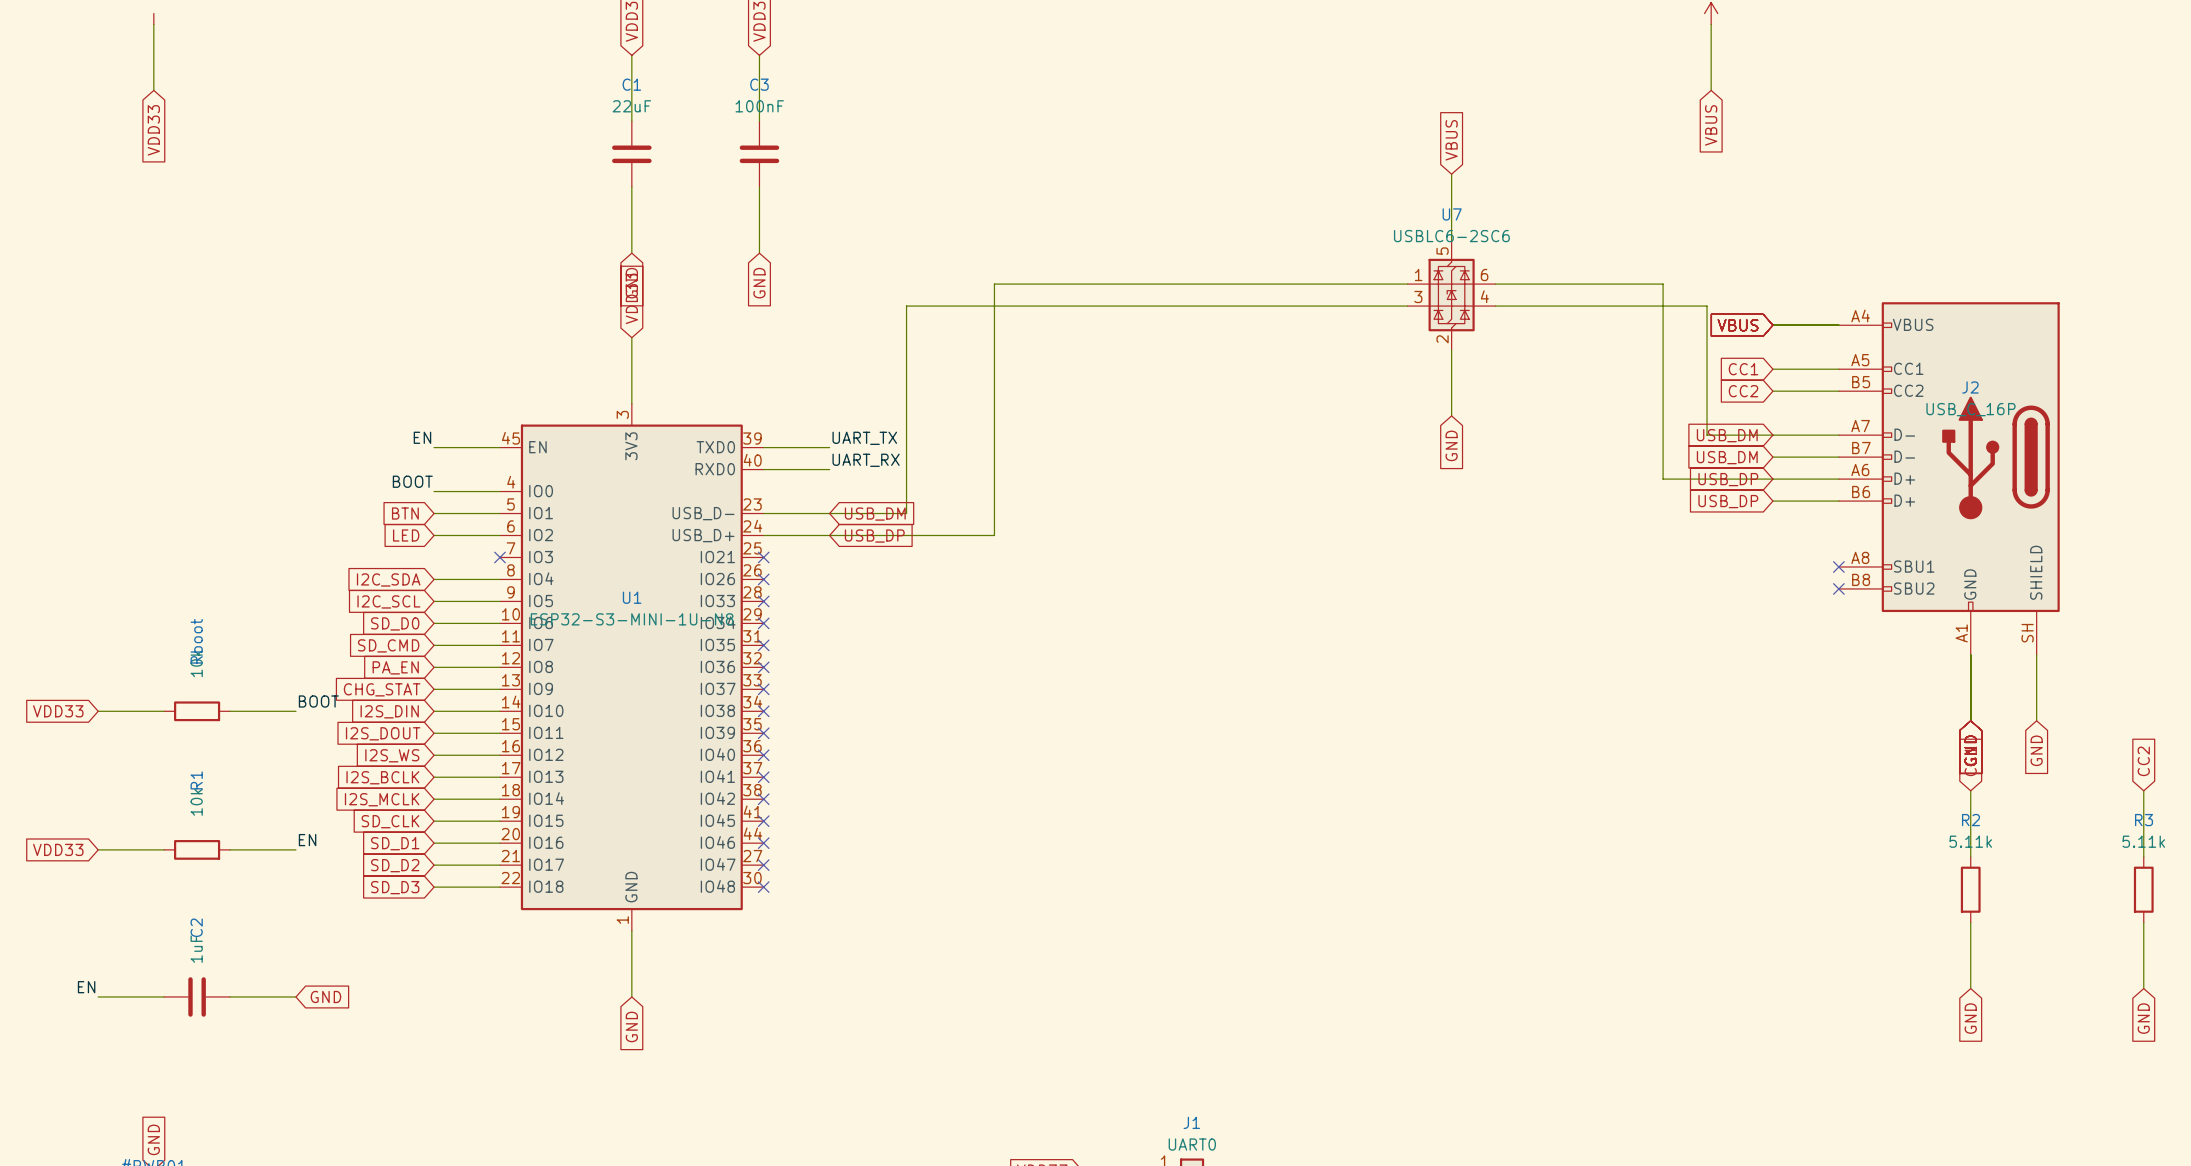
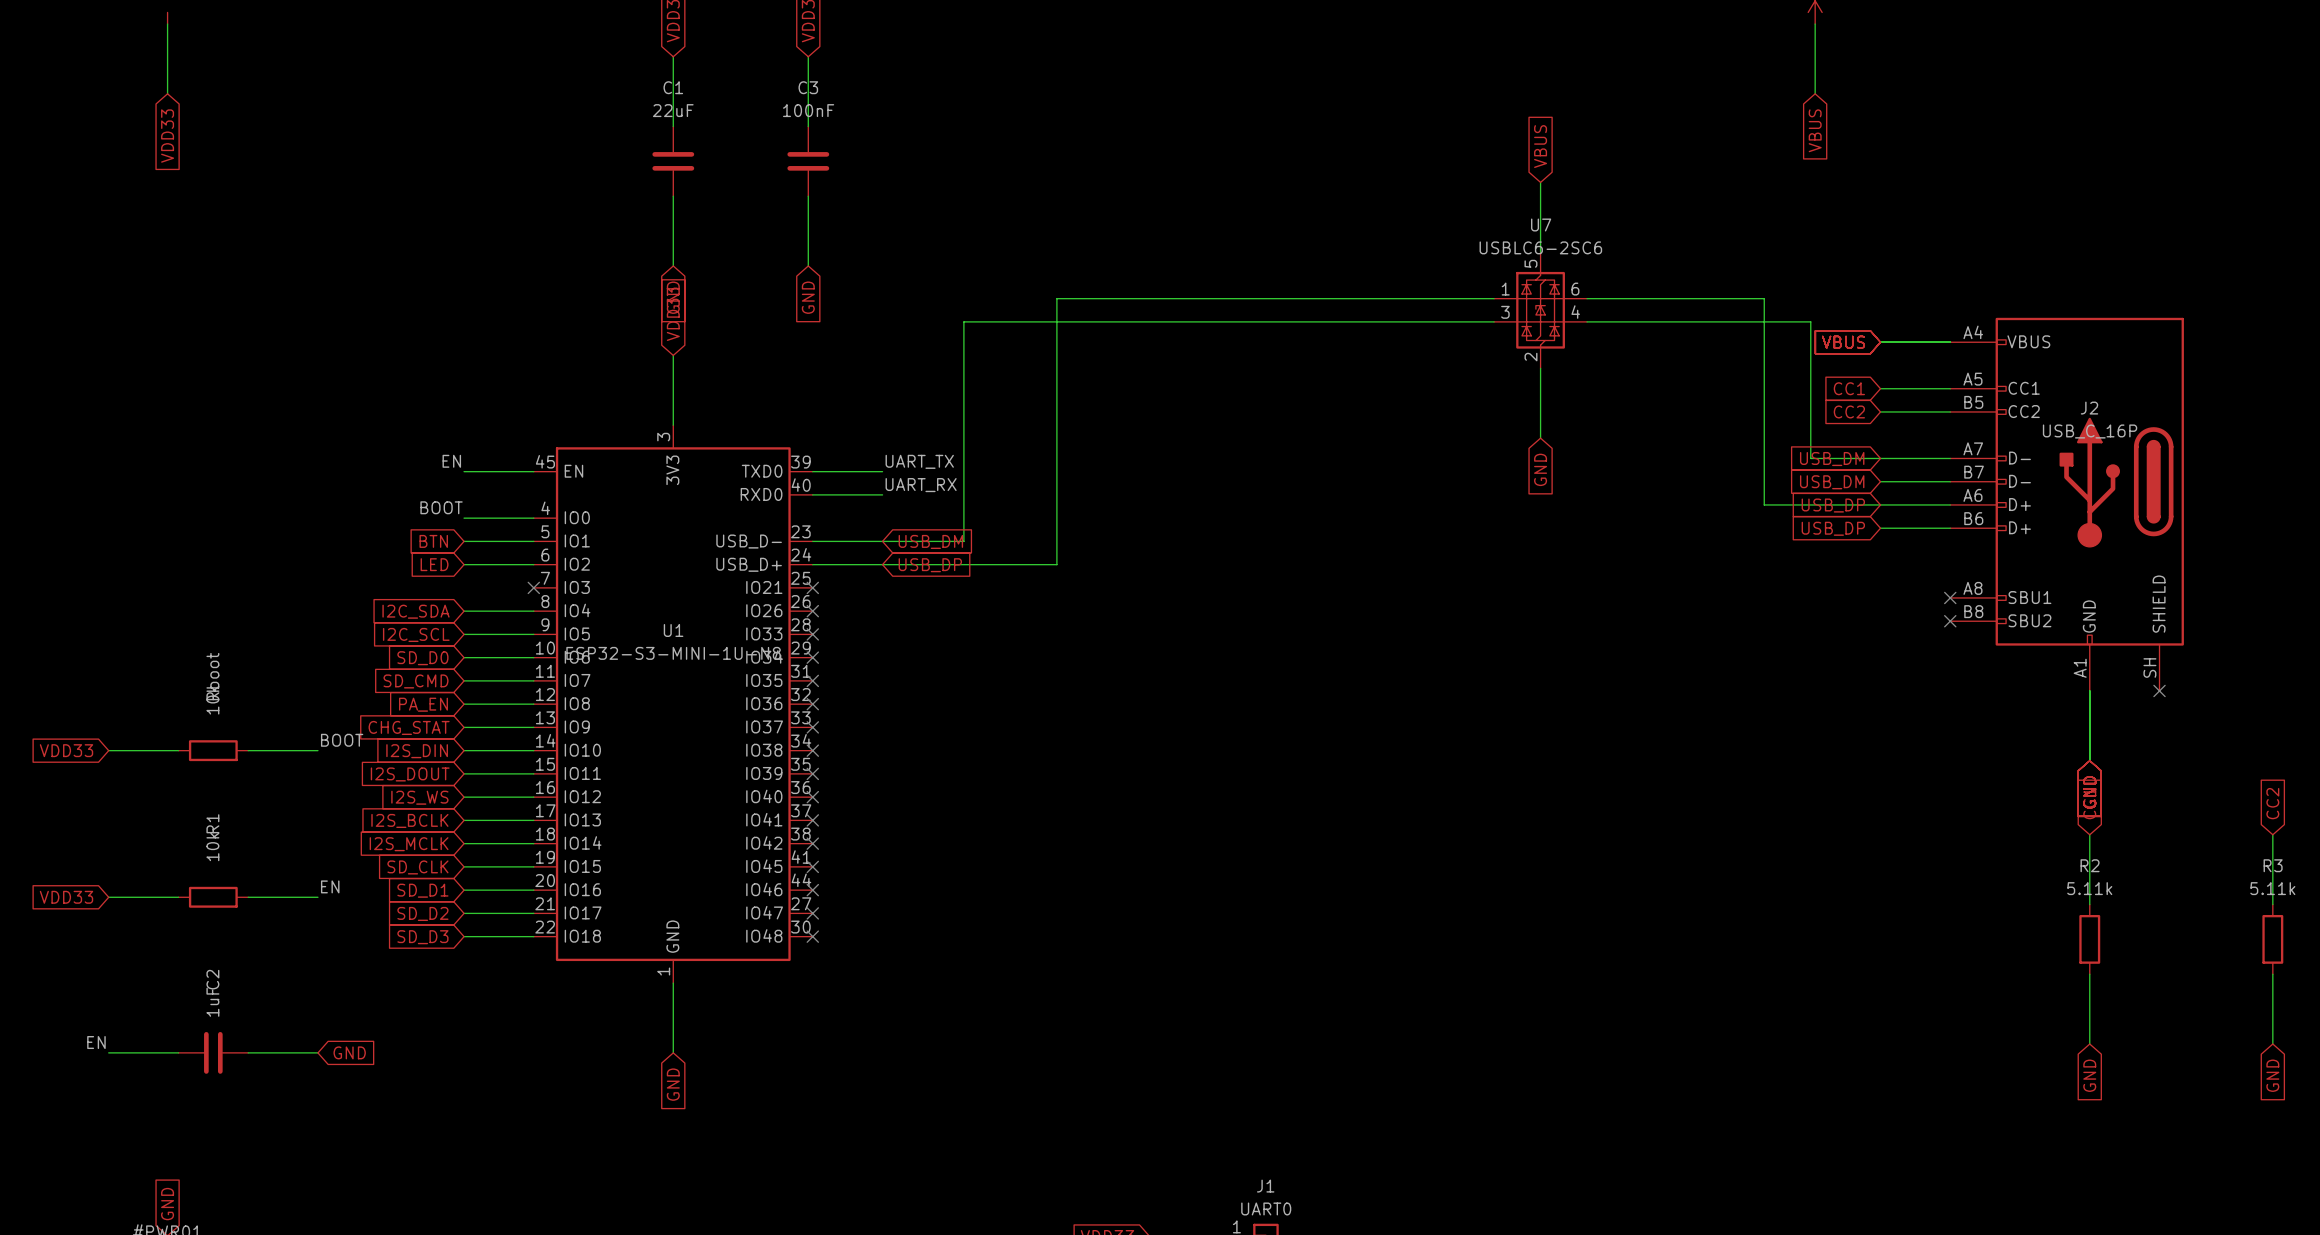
wire: (2036, 654) (2036, 720) -> none
no-connect mark: none -> (2159, 690)
global label: GND (2036, 750) -> none

